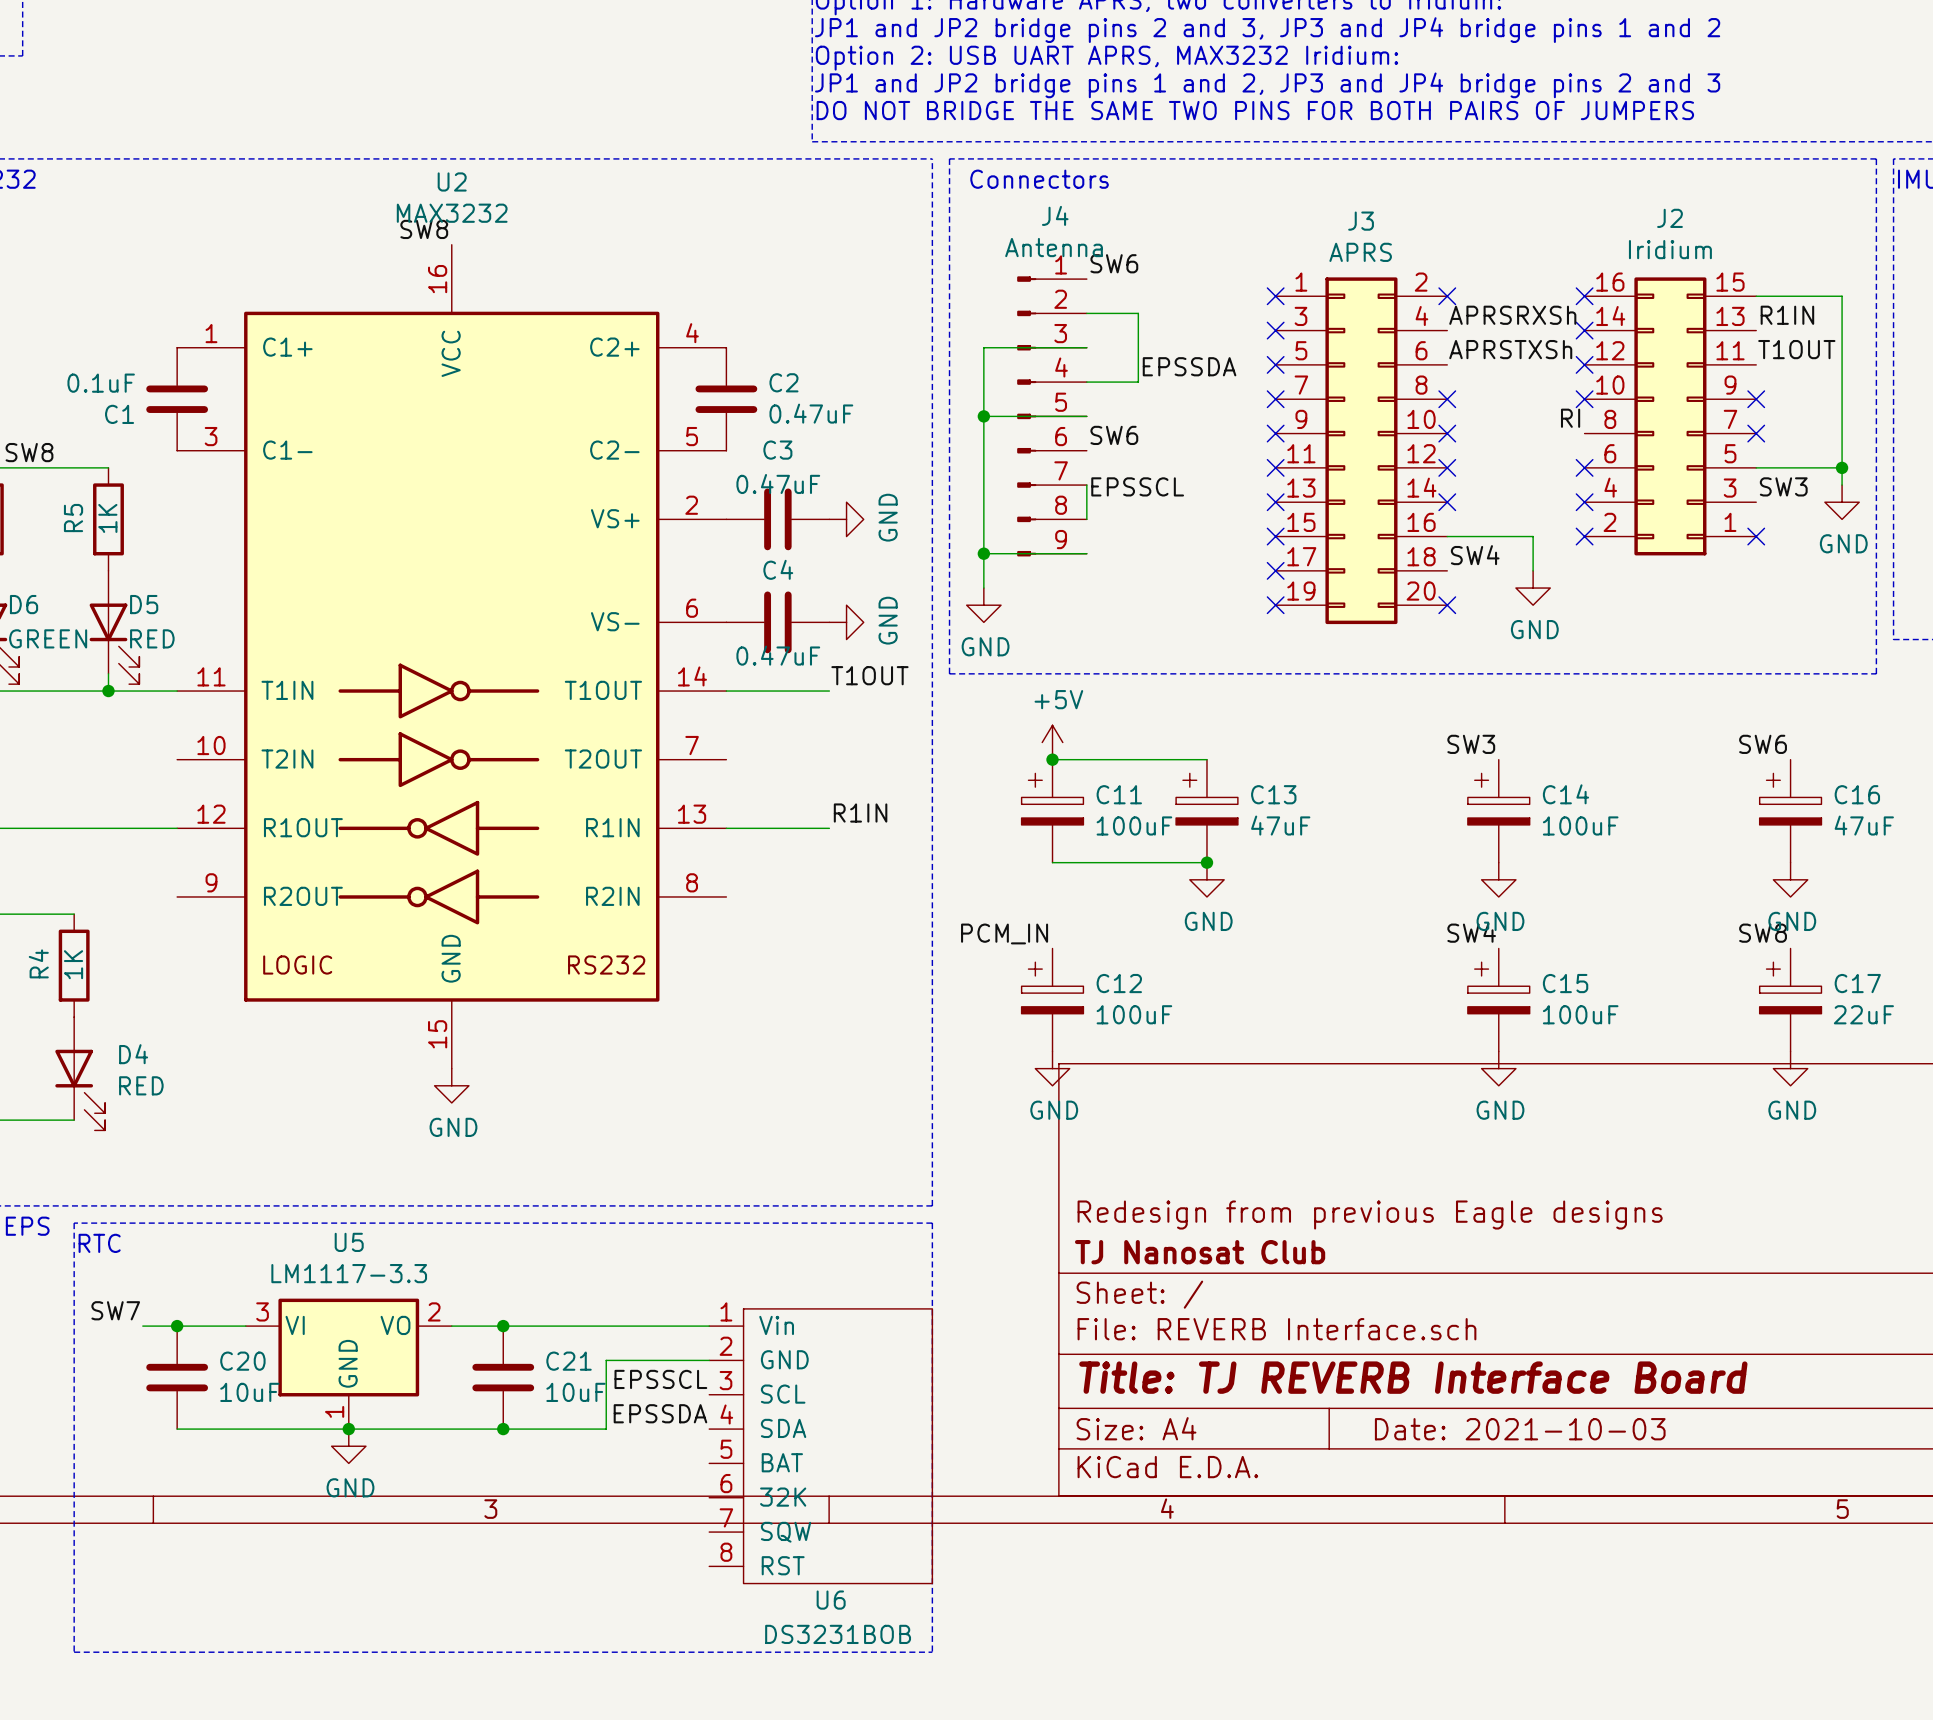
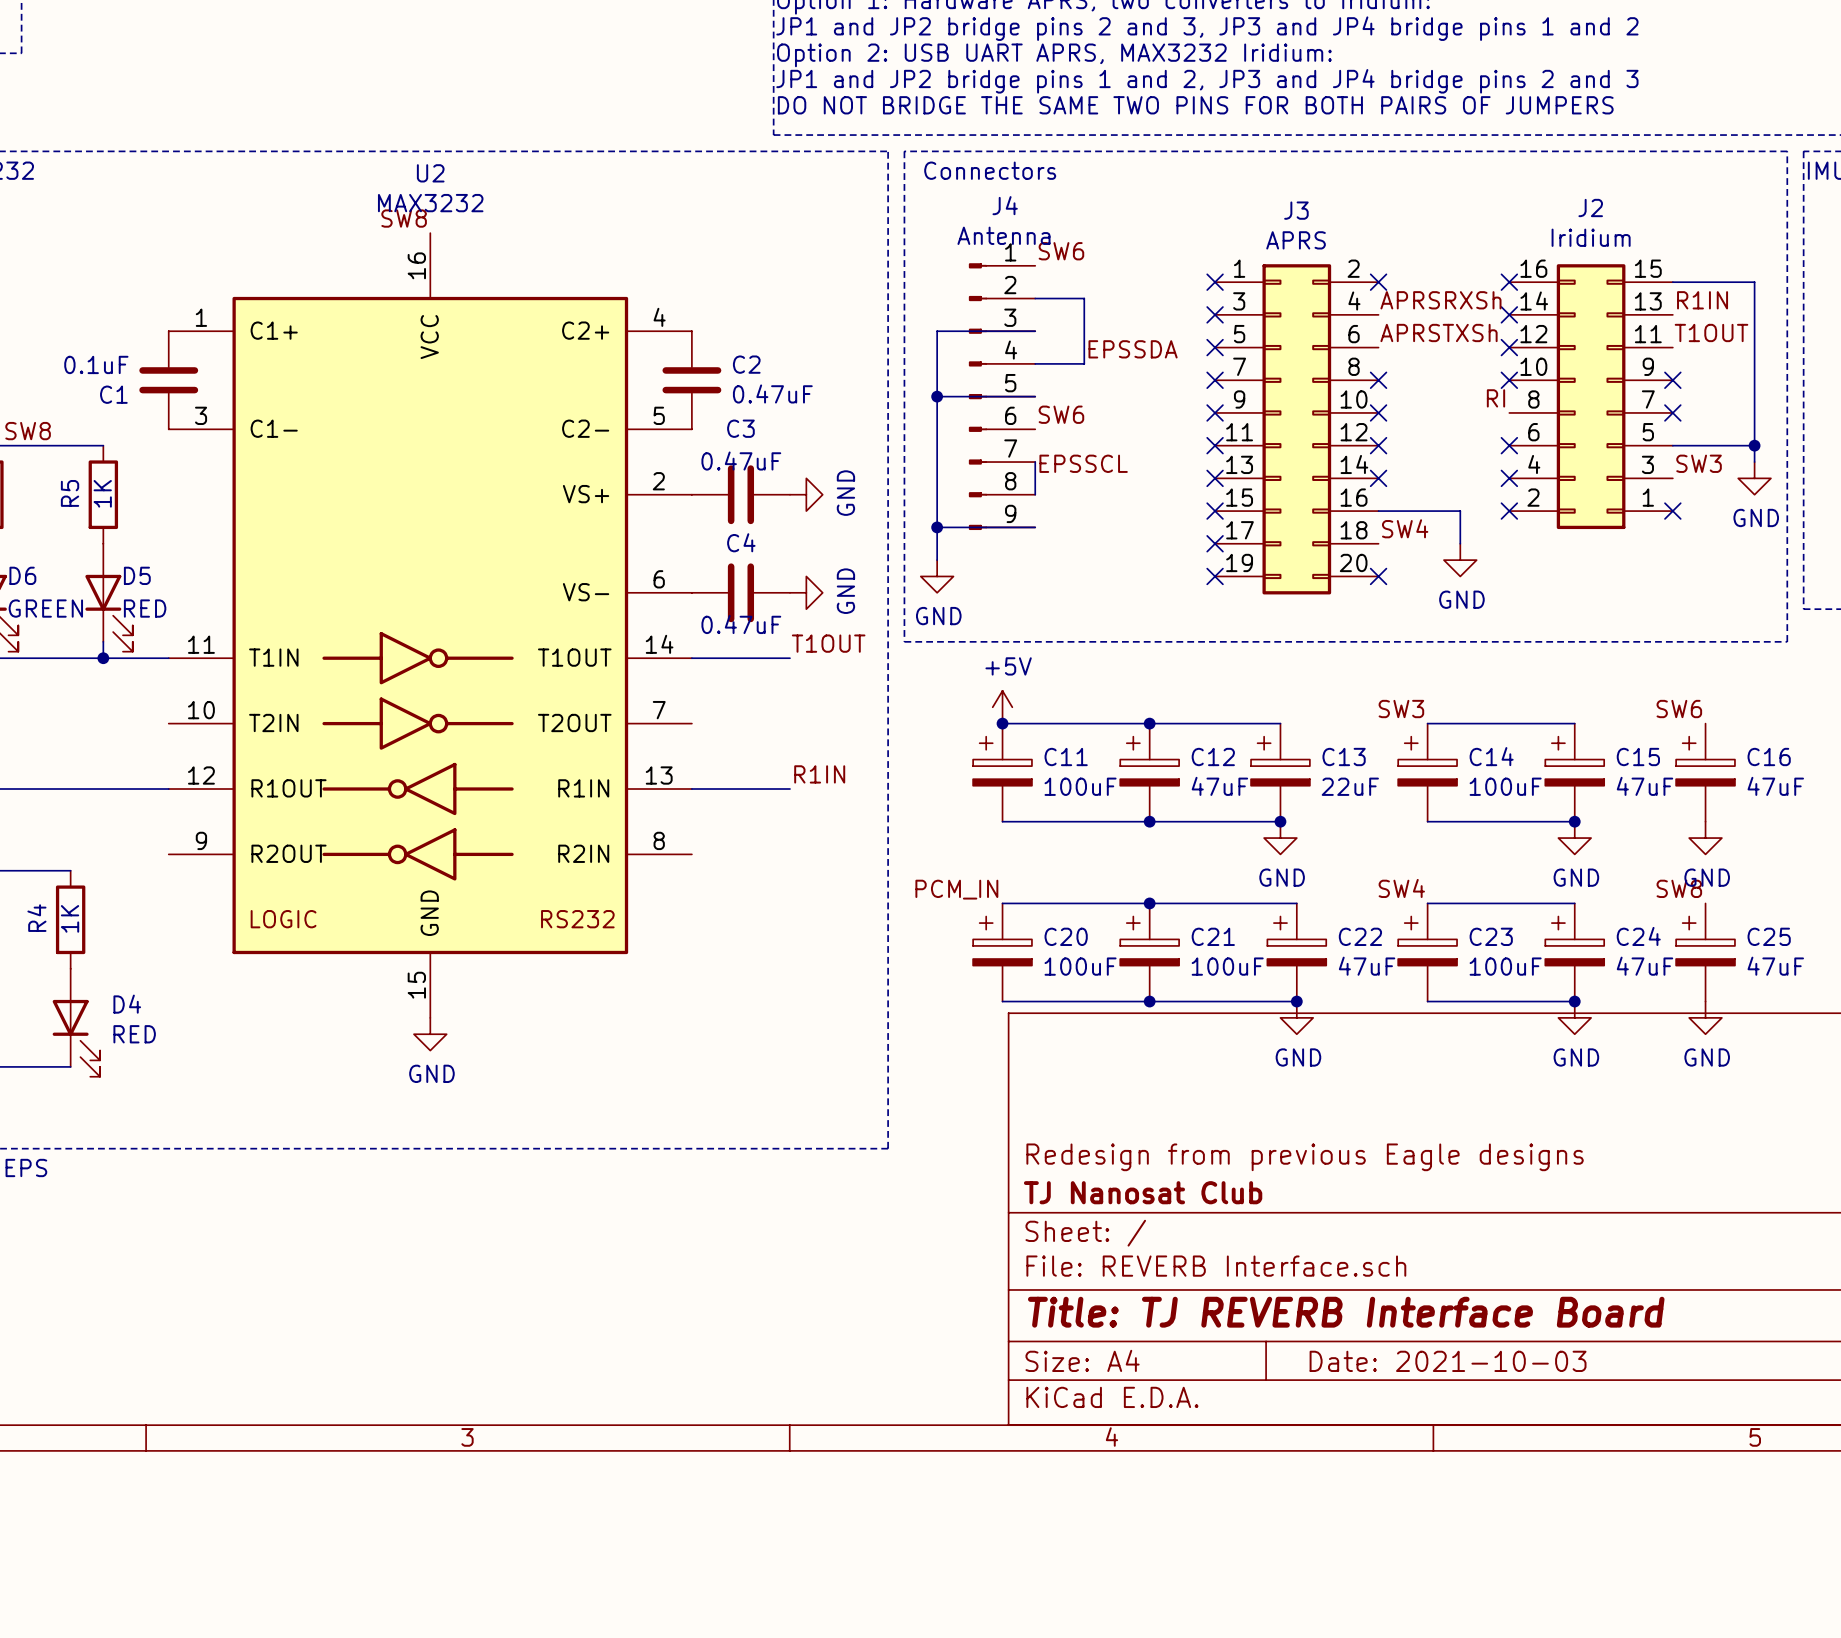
wire: none -> (1149, 723) (1280, 723)
junction: none -> (1149, 723)
wire: none -> (1427, 723) (1574, 723)
C13 name: C13 (1273, 794) -> C12 (1213, 757)
C13: none -> 22uF (1280, 772)
C15: none -> 47uF (1574, 772)
wire: none -> (1149, 821) (1280, 821)
junction: none -> (1280, 821)
wire: none -> (1427, 821) (1574, 821)
junction: none -> (1574, 821)
power symbol: GND (1206, 879) -> none
power symbol: none -> GND (1280, 838)
power symbol: GND (1498, 879) -> none
power symbol: none -> GND (1574, 838)
wire: none -> (1002, 903) (1296, 903)
junction: none -> (1149, 903)
wire: none -> (1427, 903) (1574, 903)
C12 name: C12 (1119, 983) -> C20 (1066, 936)
C15 name: C15 (1565, 983) -> C23 (1491, 936)
C17 name: C17 (1857, 983) -> C25 (1769, 936)
C22: none -> 47uF (1296, 952)
C24: none -> 47uF (1574, 952)
C17 value: 22uF (1863, 1014) -> 47uF (1775, 966)
wire: none -> (1002, 1001) (1296, 1001)
junction: none -> (1149, 1001)
junction: none -> (1296, 1001)
wire: none -> (1427, 1001) (1574, 1001)
junction: none -> (1574, 1001)
power symbol: GND (1052, 1068) -> none
power symbol: none -> GND (1296, 1017)
power symbol: GND (1498, 1068) -> none
power symbol: none -> GND (1574, 1017)
line: (74, 1223) (74, 1652) (932, 1652) (932, 1223) (74, 1223) -> none
text: RTC (99, 1243) -> none
label: SW7 (115, 1310) -> none
wire: (142, 1326) (245, 1326) -> none
junction: (177, 1326) -> none
wire: (451, 1326) (709, 1326) -> none
C21 symbol: [472, 1326, 535, 1430] -> [1120, 903, 1180, 1002]
junction: (503, 1326) -> none
wire: (709, 1360) (606, 1360) (606, 1429) (177, 1429) -> none
U5: LM1117-3.3 (348, 1363) -> none
C20: 10uF (177, 1377) -> none
label: EPSSCL (660, 1379) -> none
C21 value: 10uF (575, 1392) -> 100uF (1227, 966)
label: EPSSDA (660, 1413) -> none
junction: (348, 1429) -> none
junction: (503, 1429) -> none
power symbol: GND (348, 1446) -> none
U6: DS3231BOB (820, 1446) -> none

